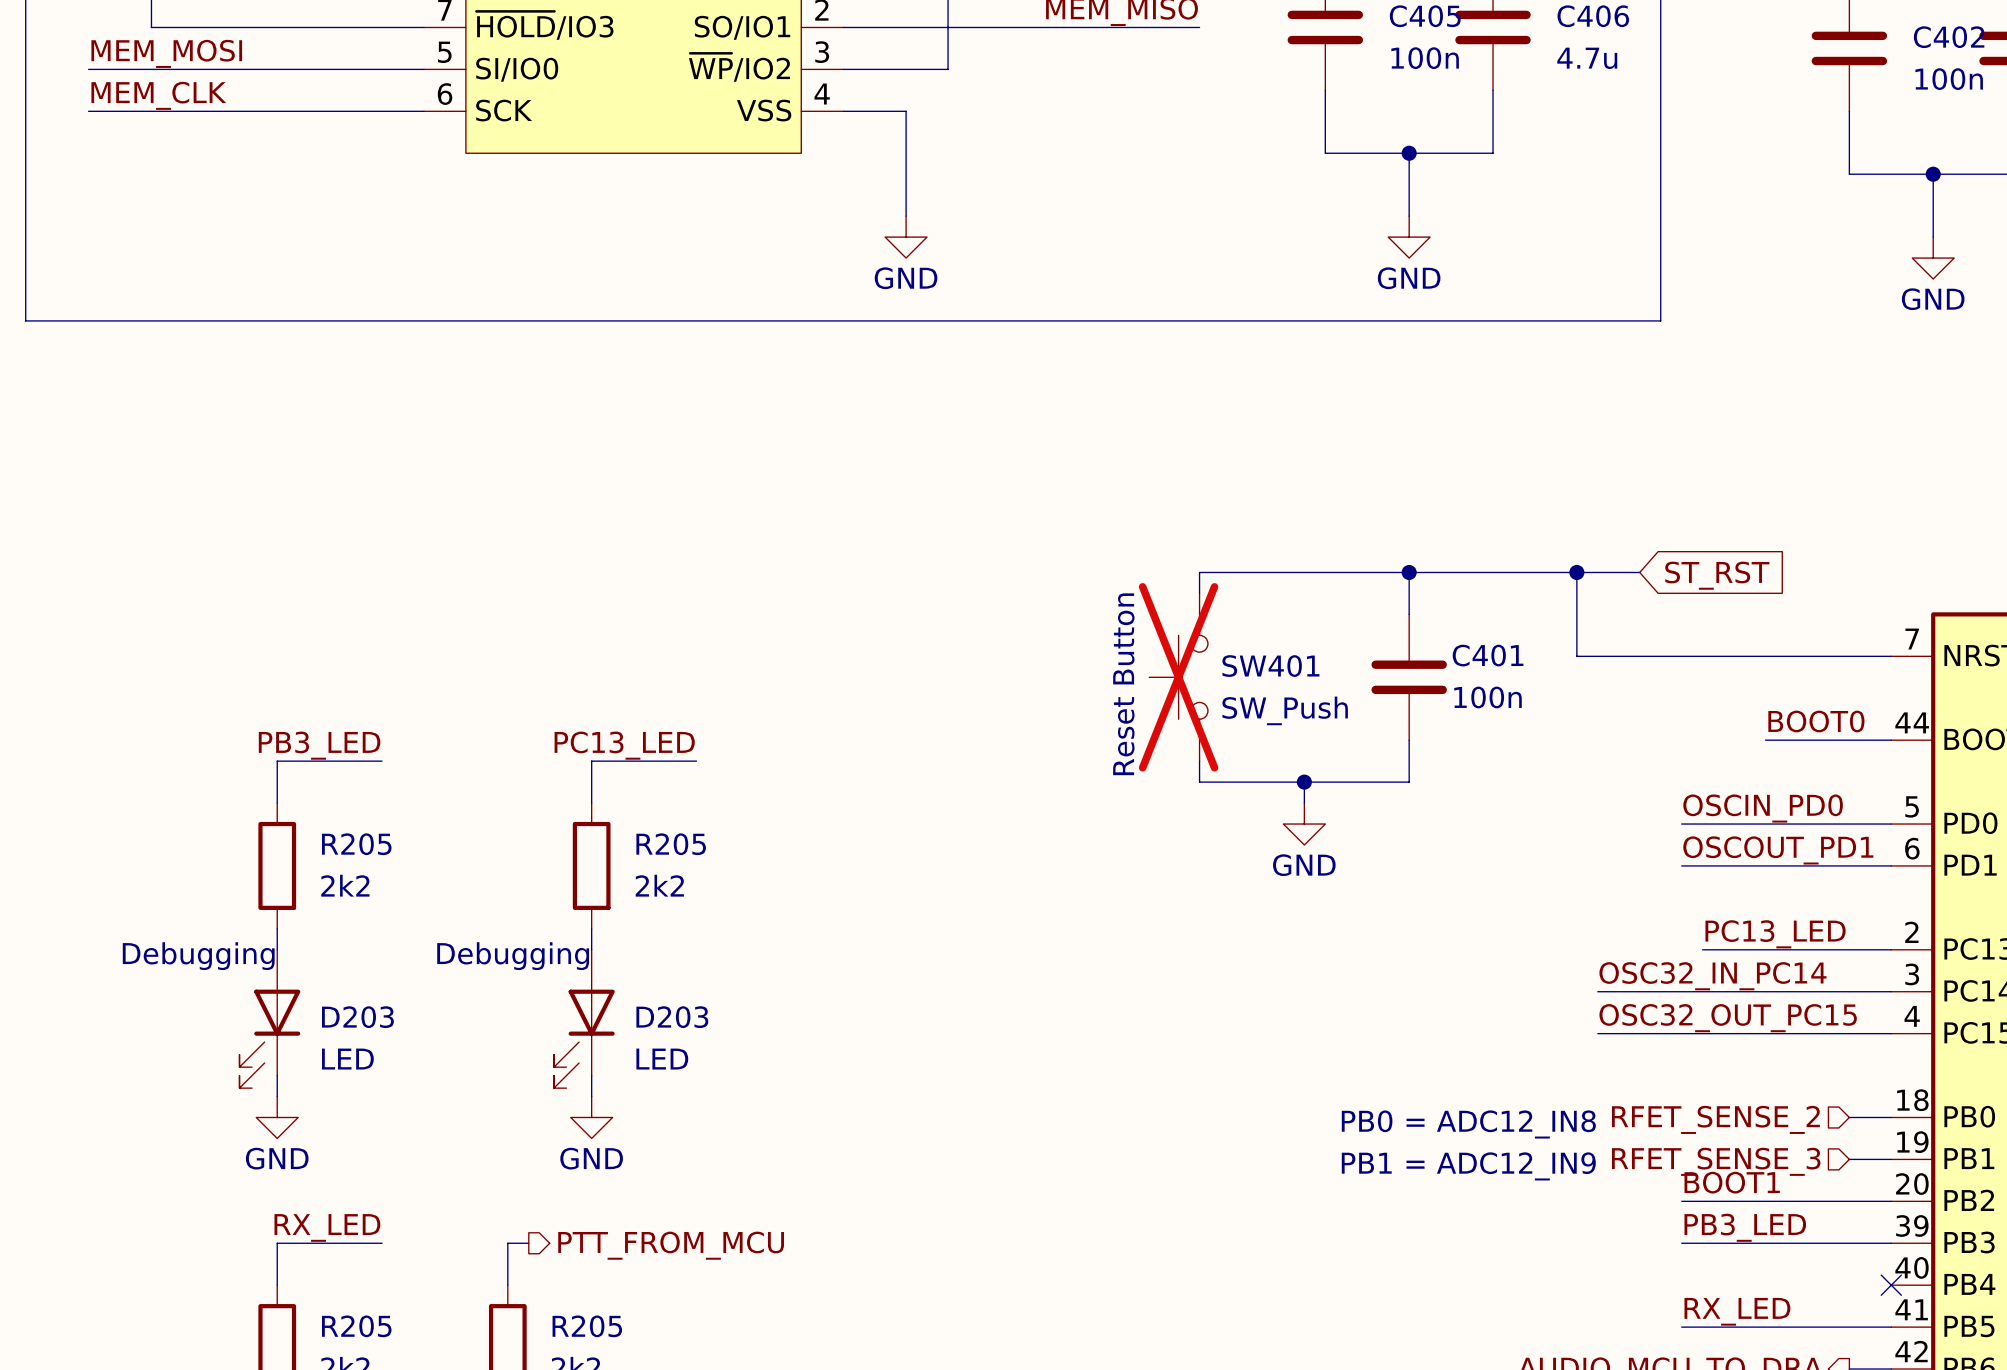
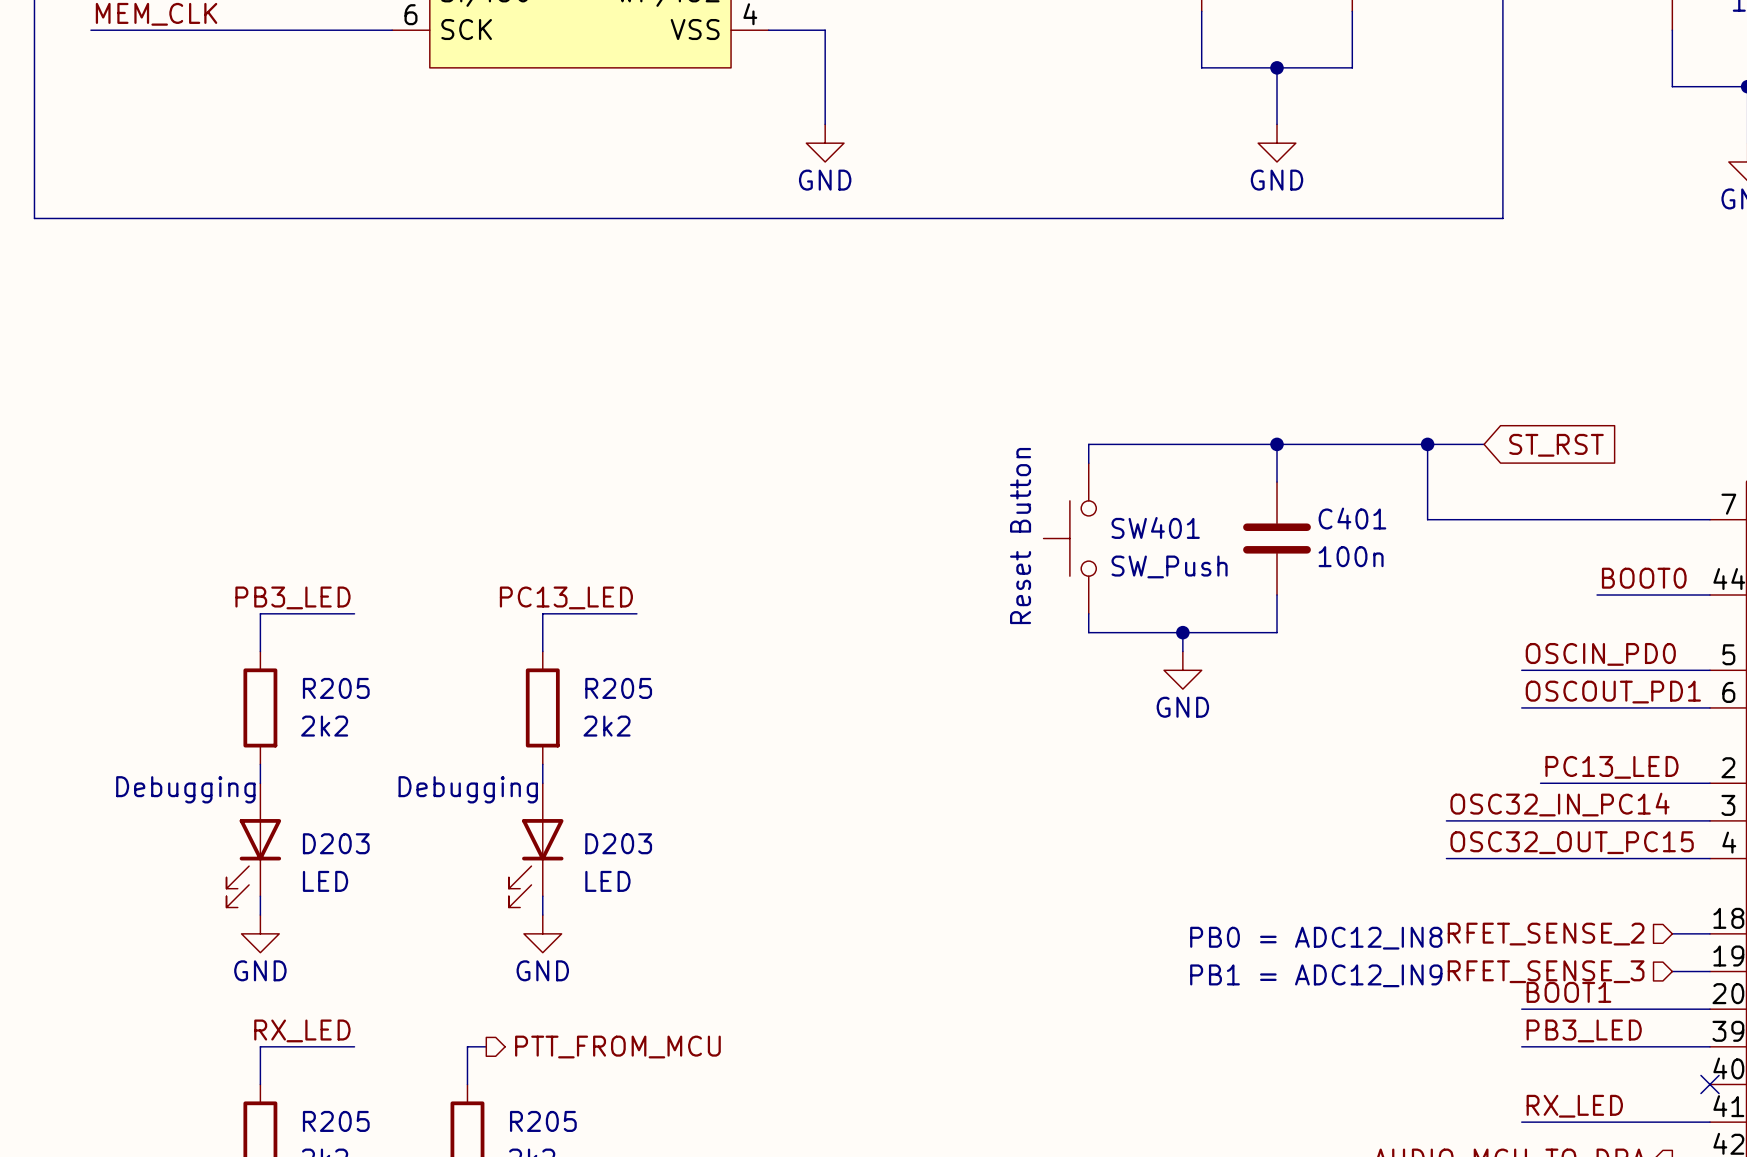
SW401 do-not-place cross: (1178, 677) -> none

